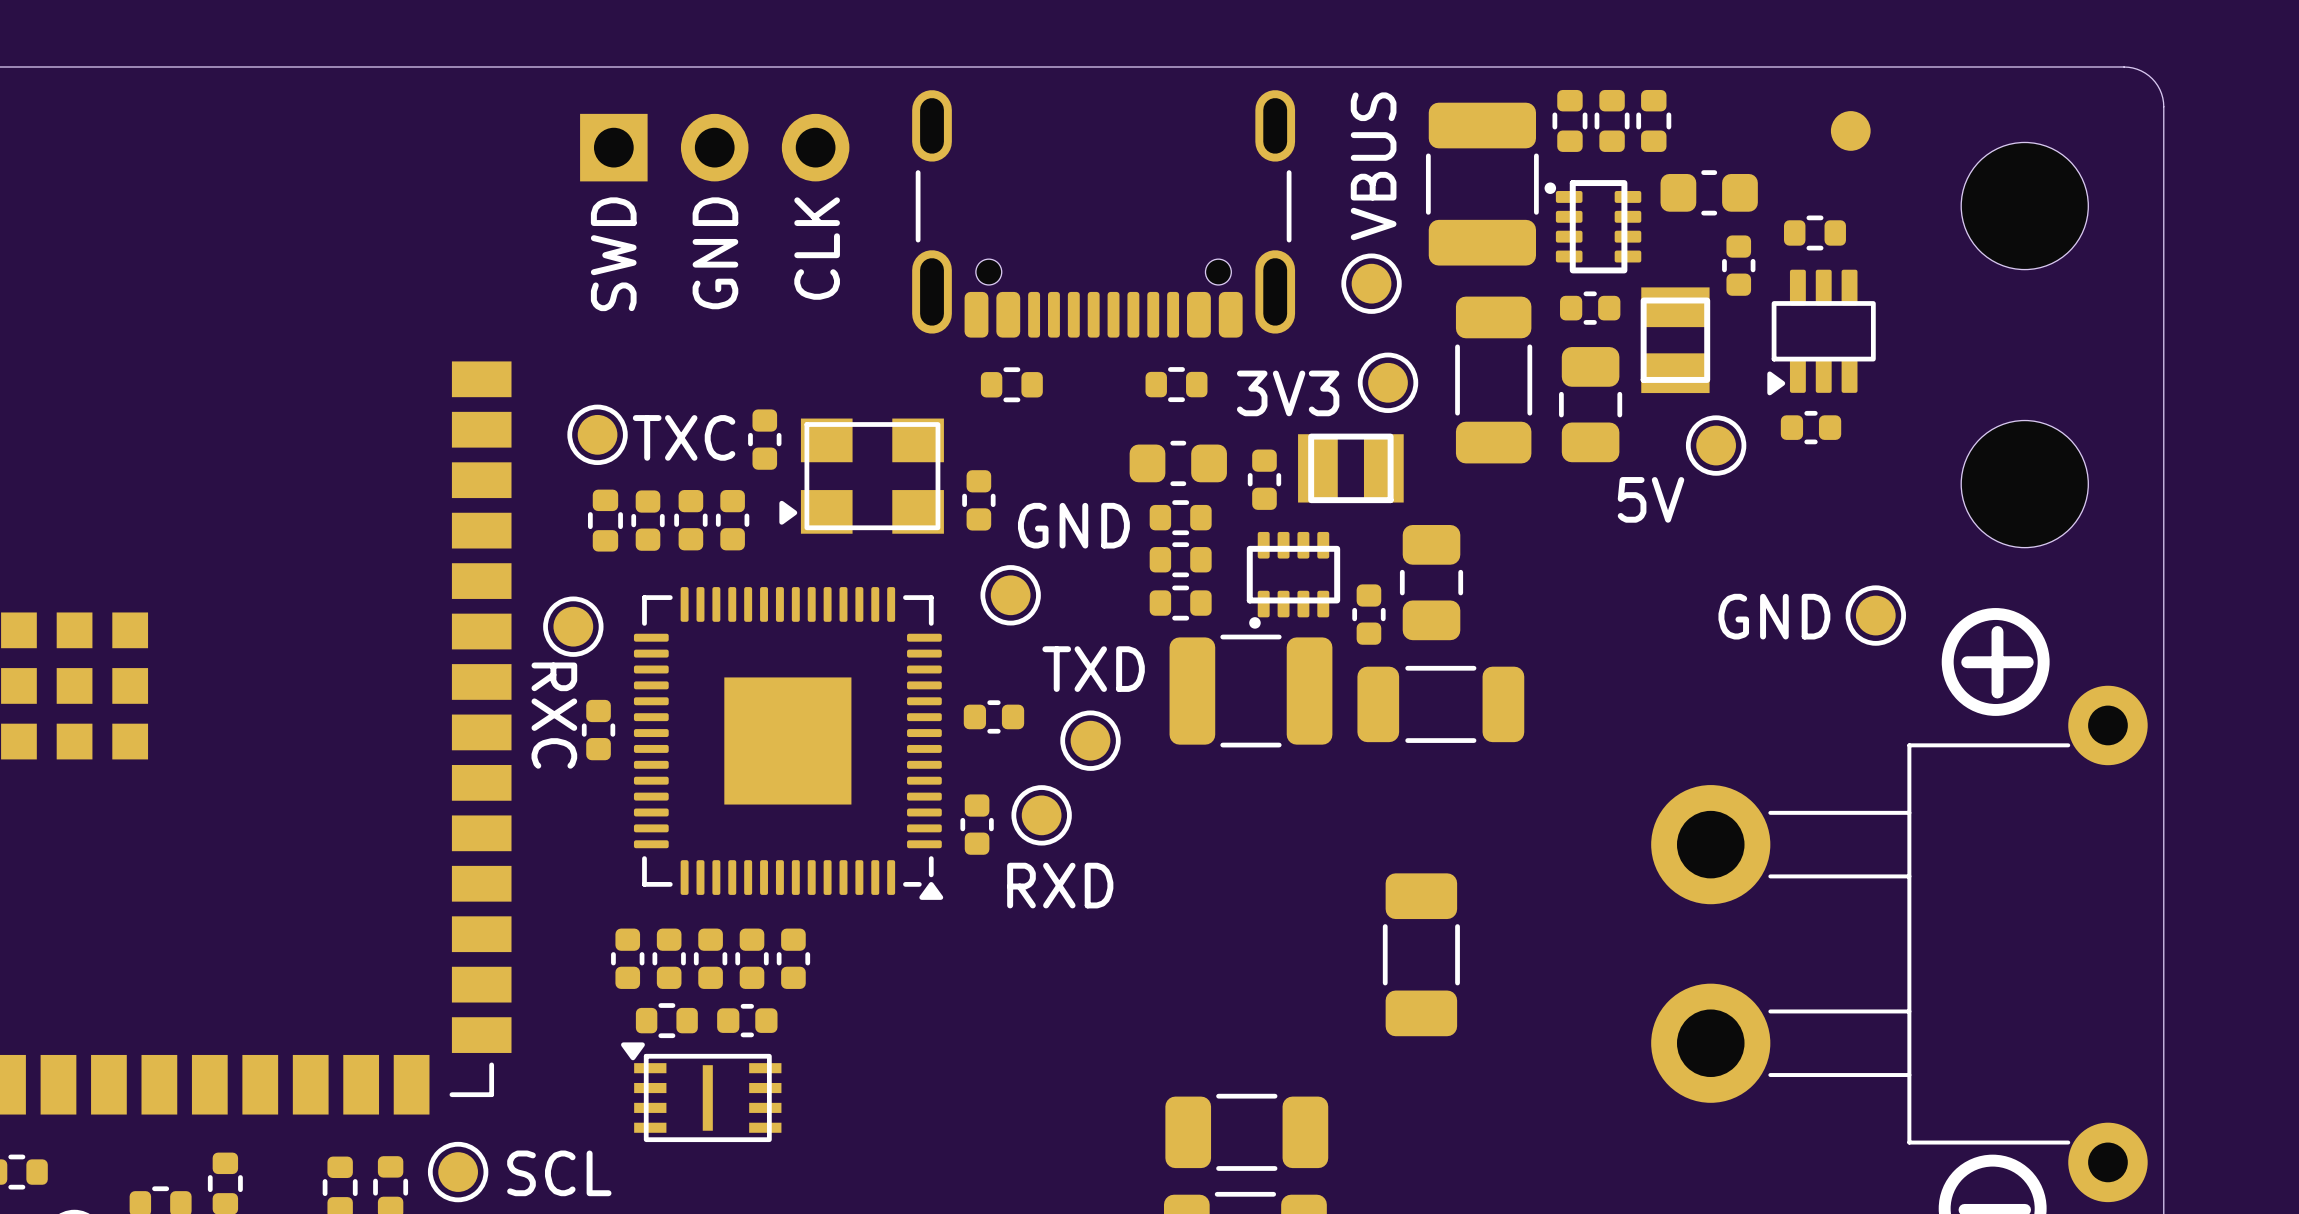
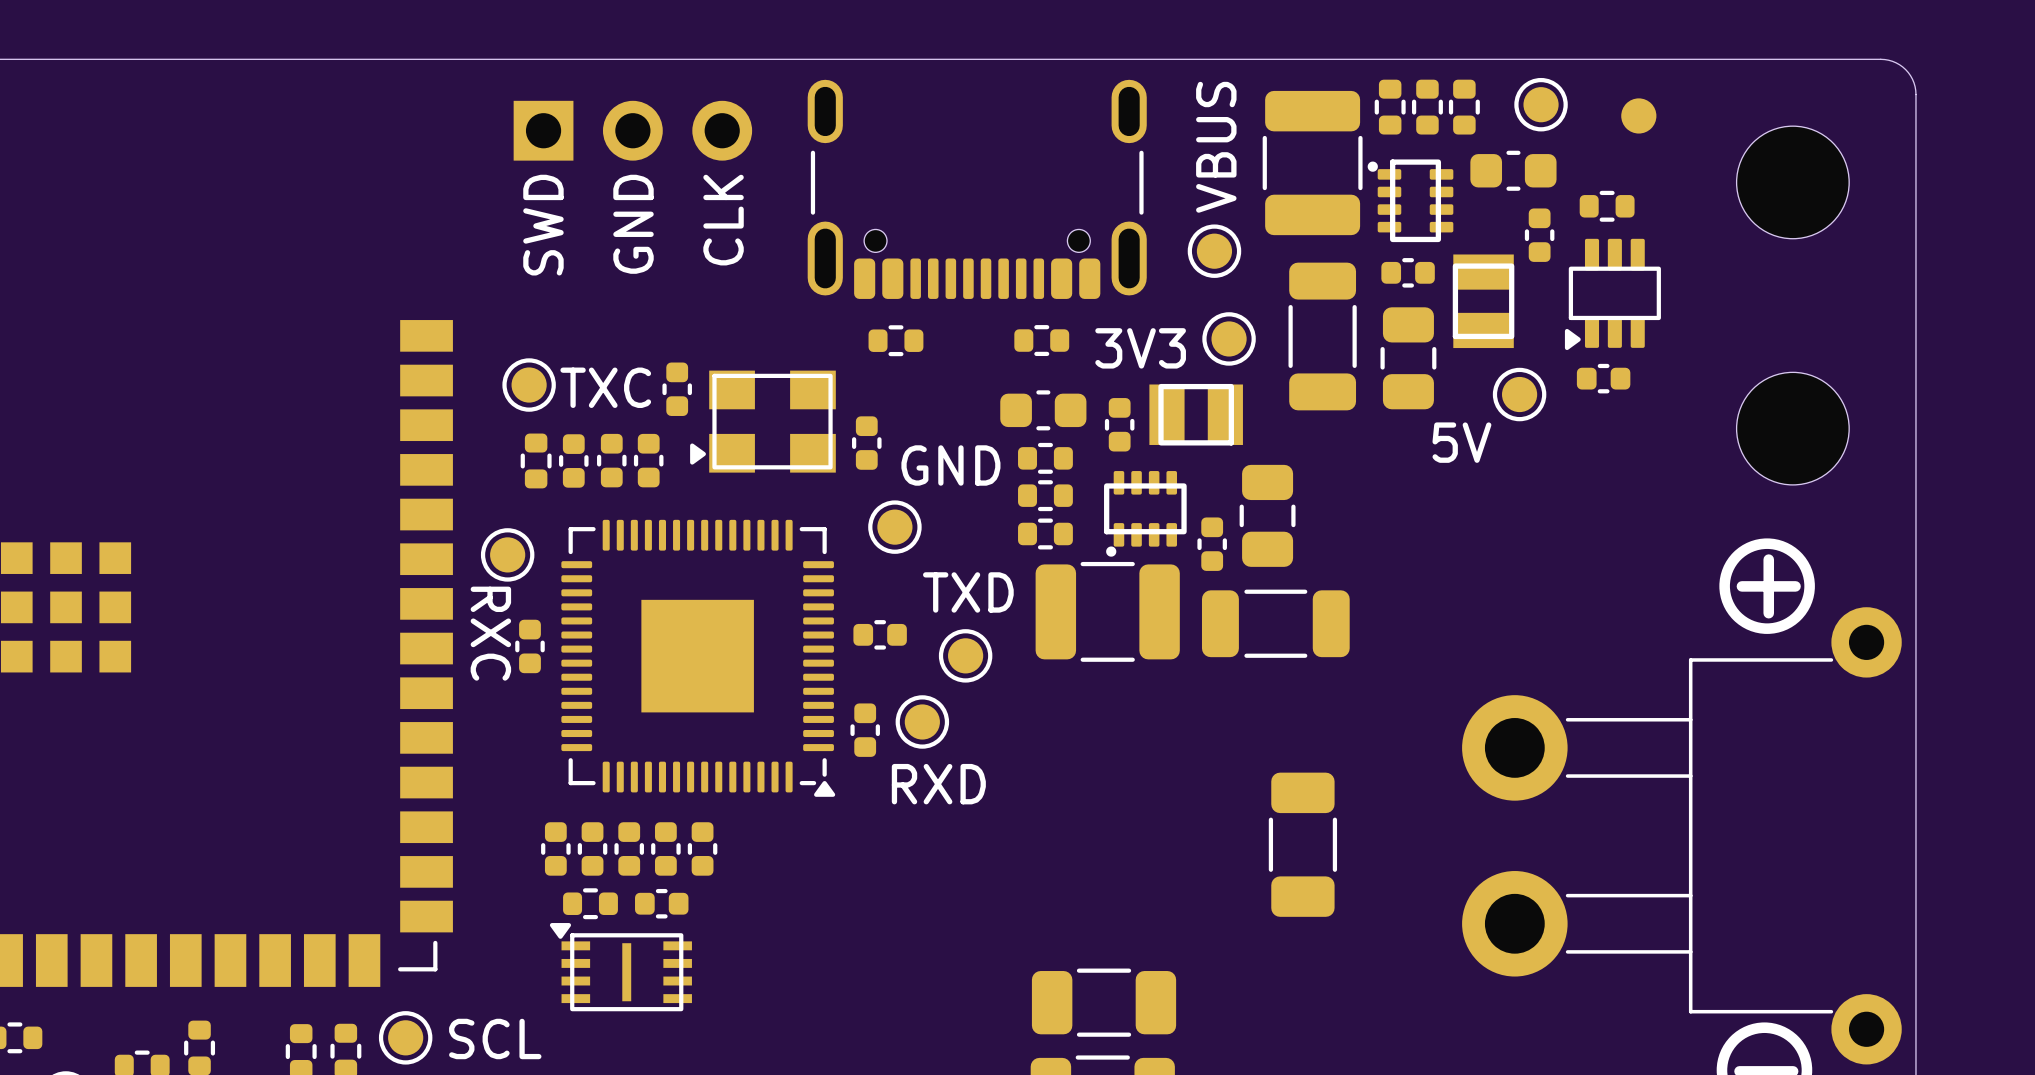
part: none -> (1541, 104)
part: GND (1875, 615) -> none
part position: (1421, 954) -> (1302, 844)

